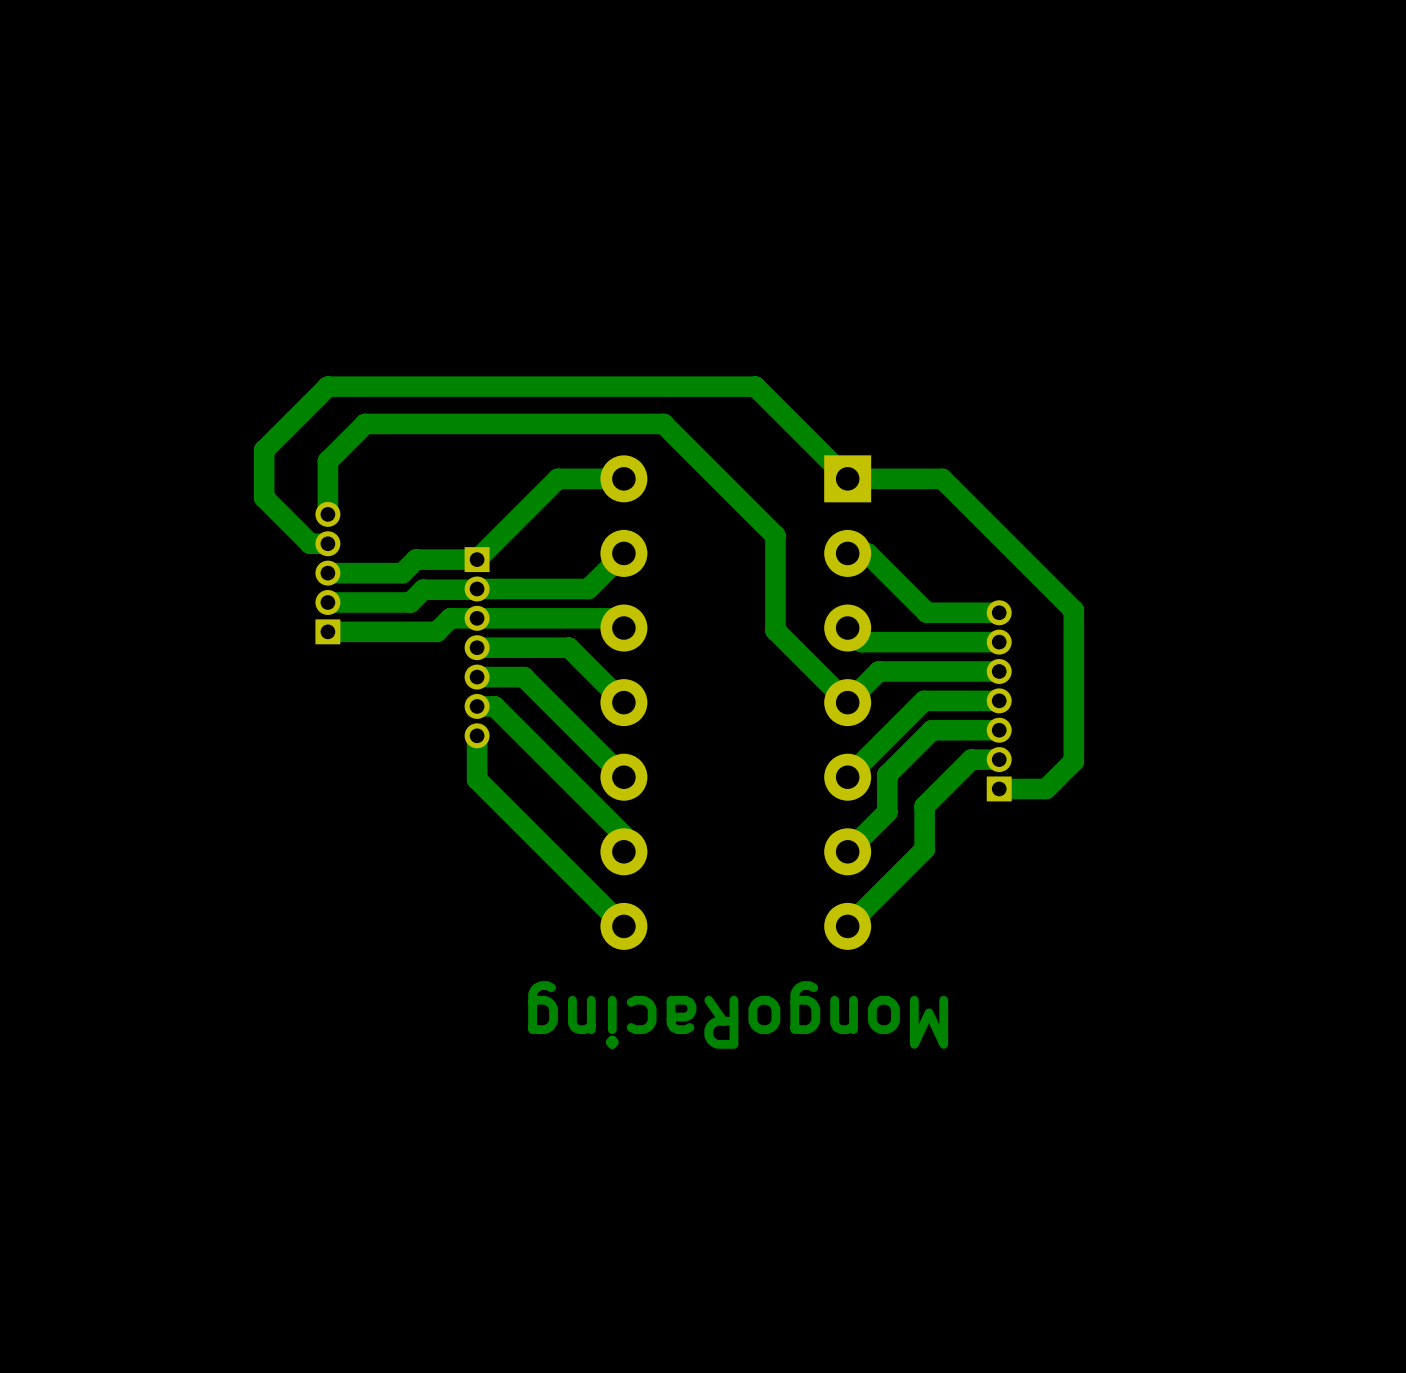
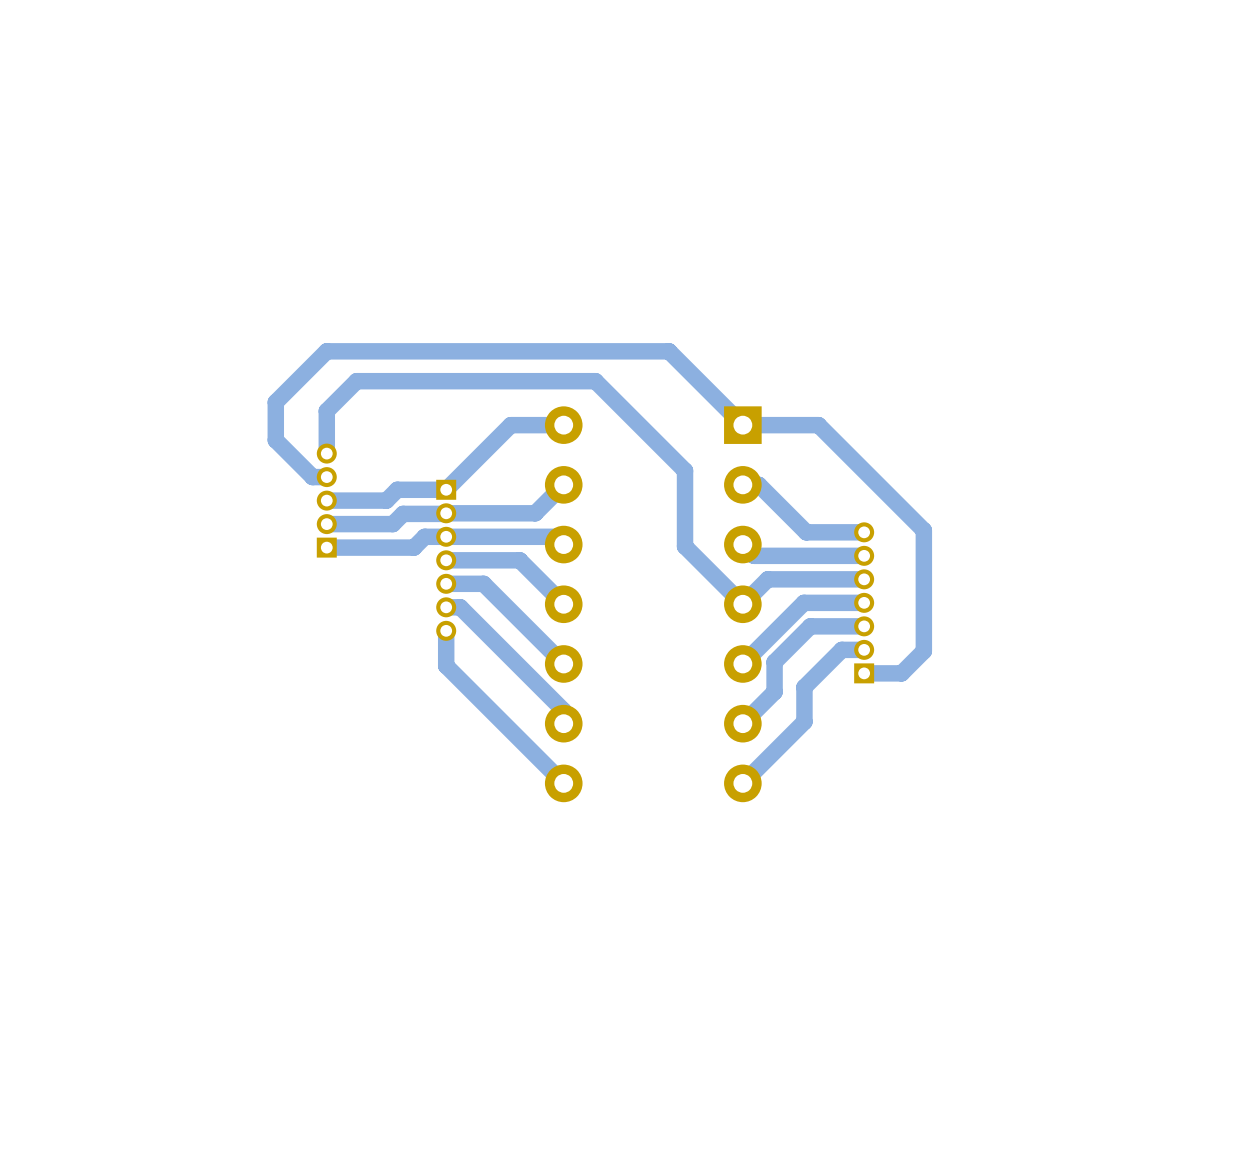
text: MongoRacing (738, 1014) -> none

